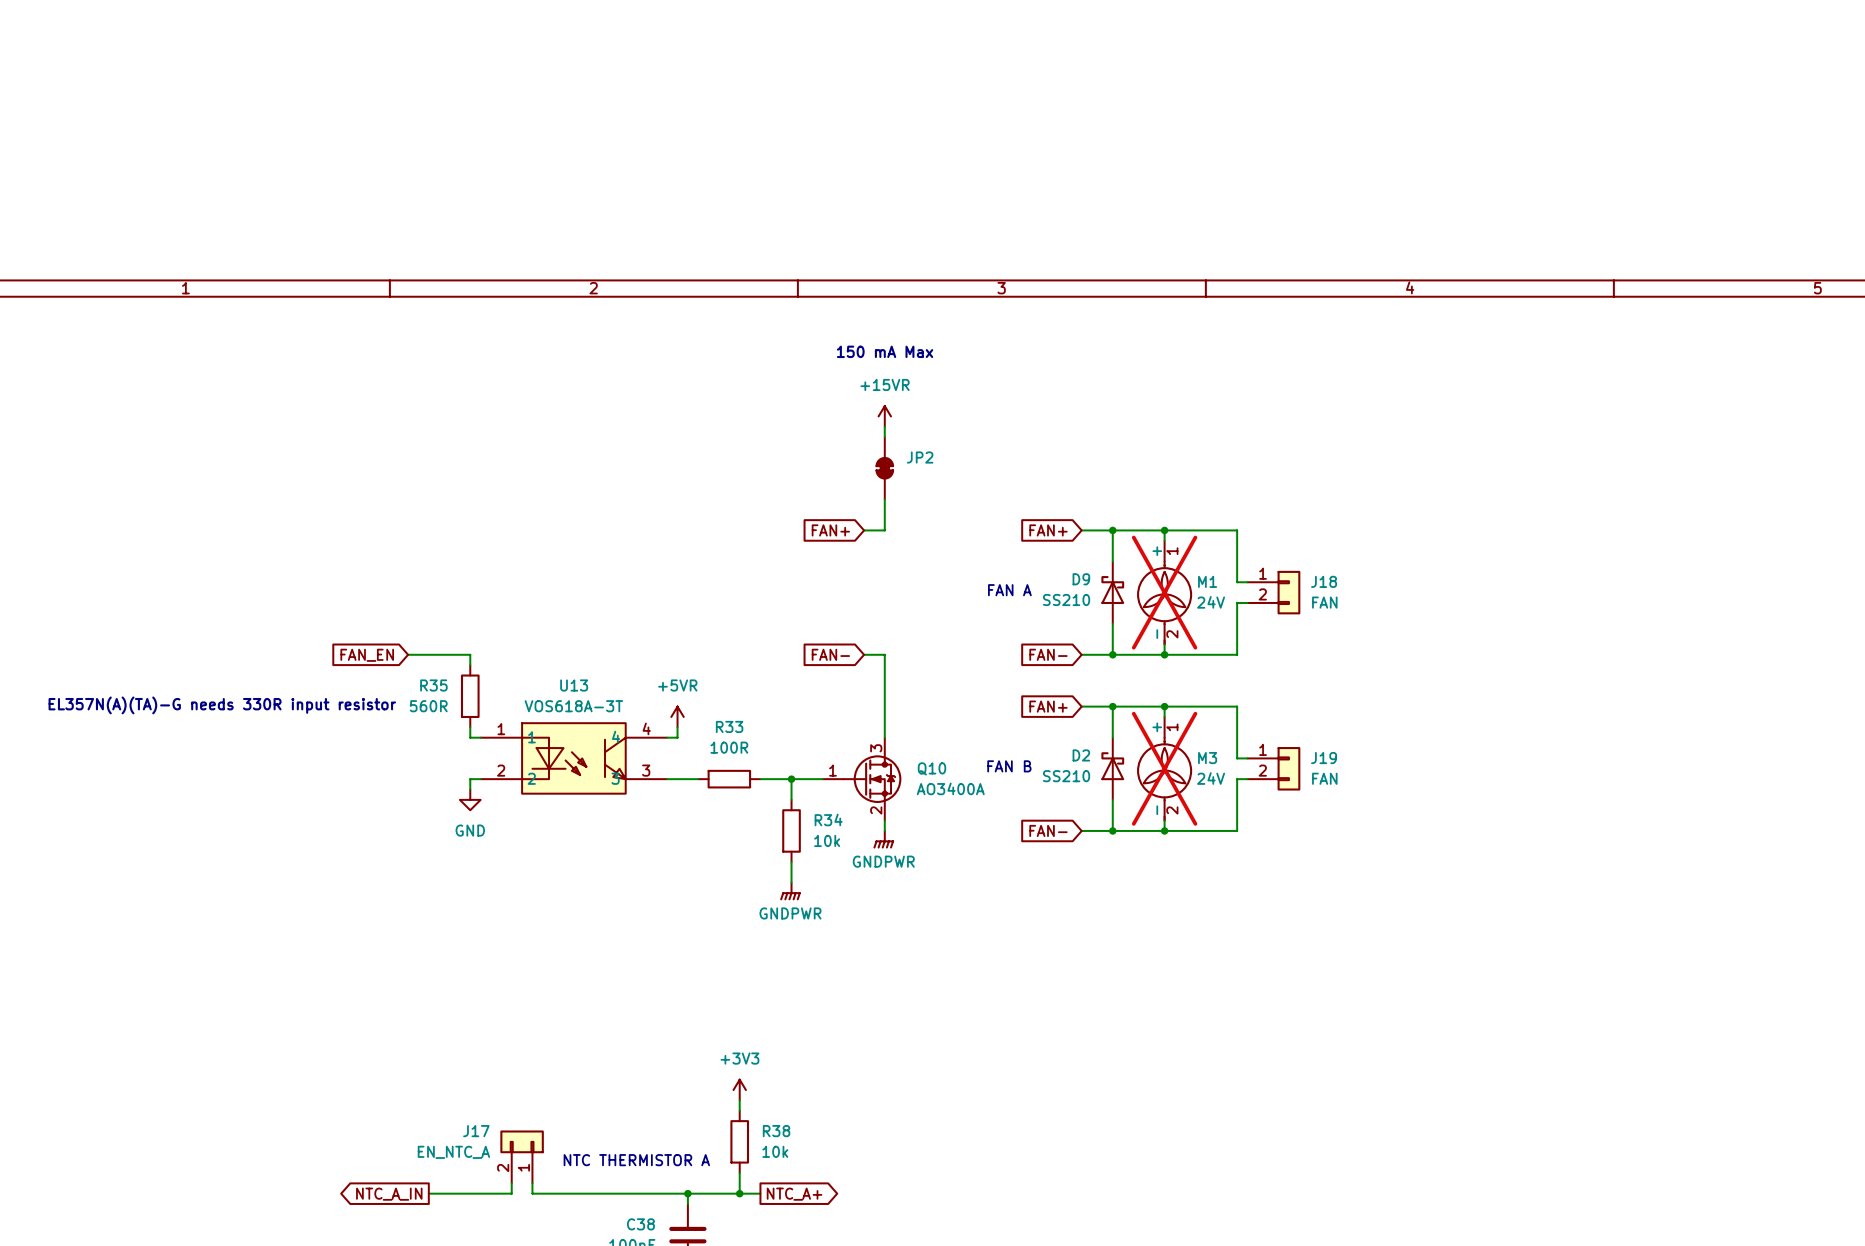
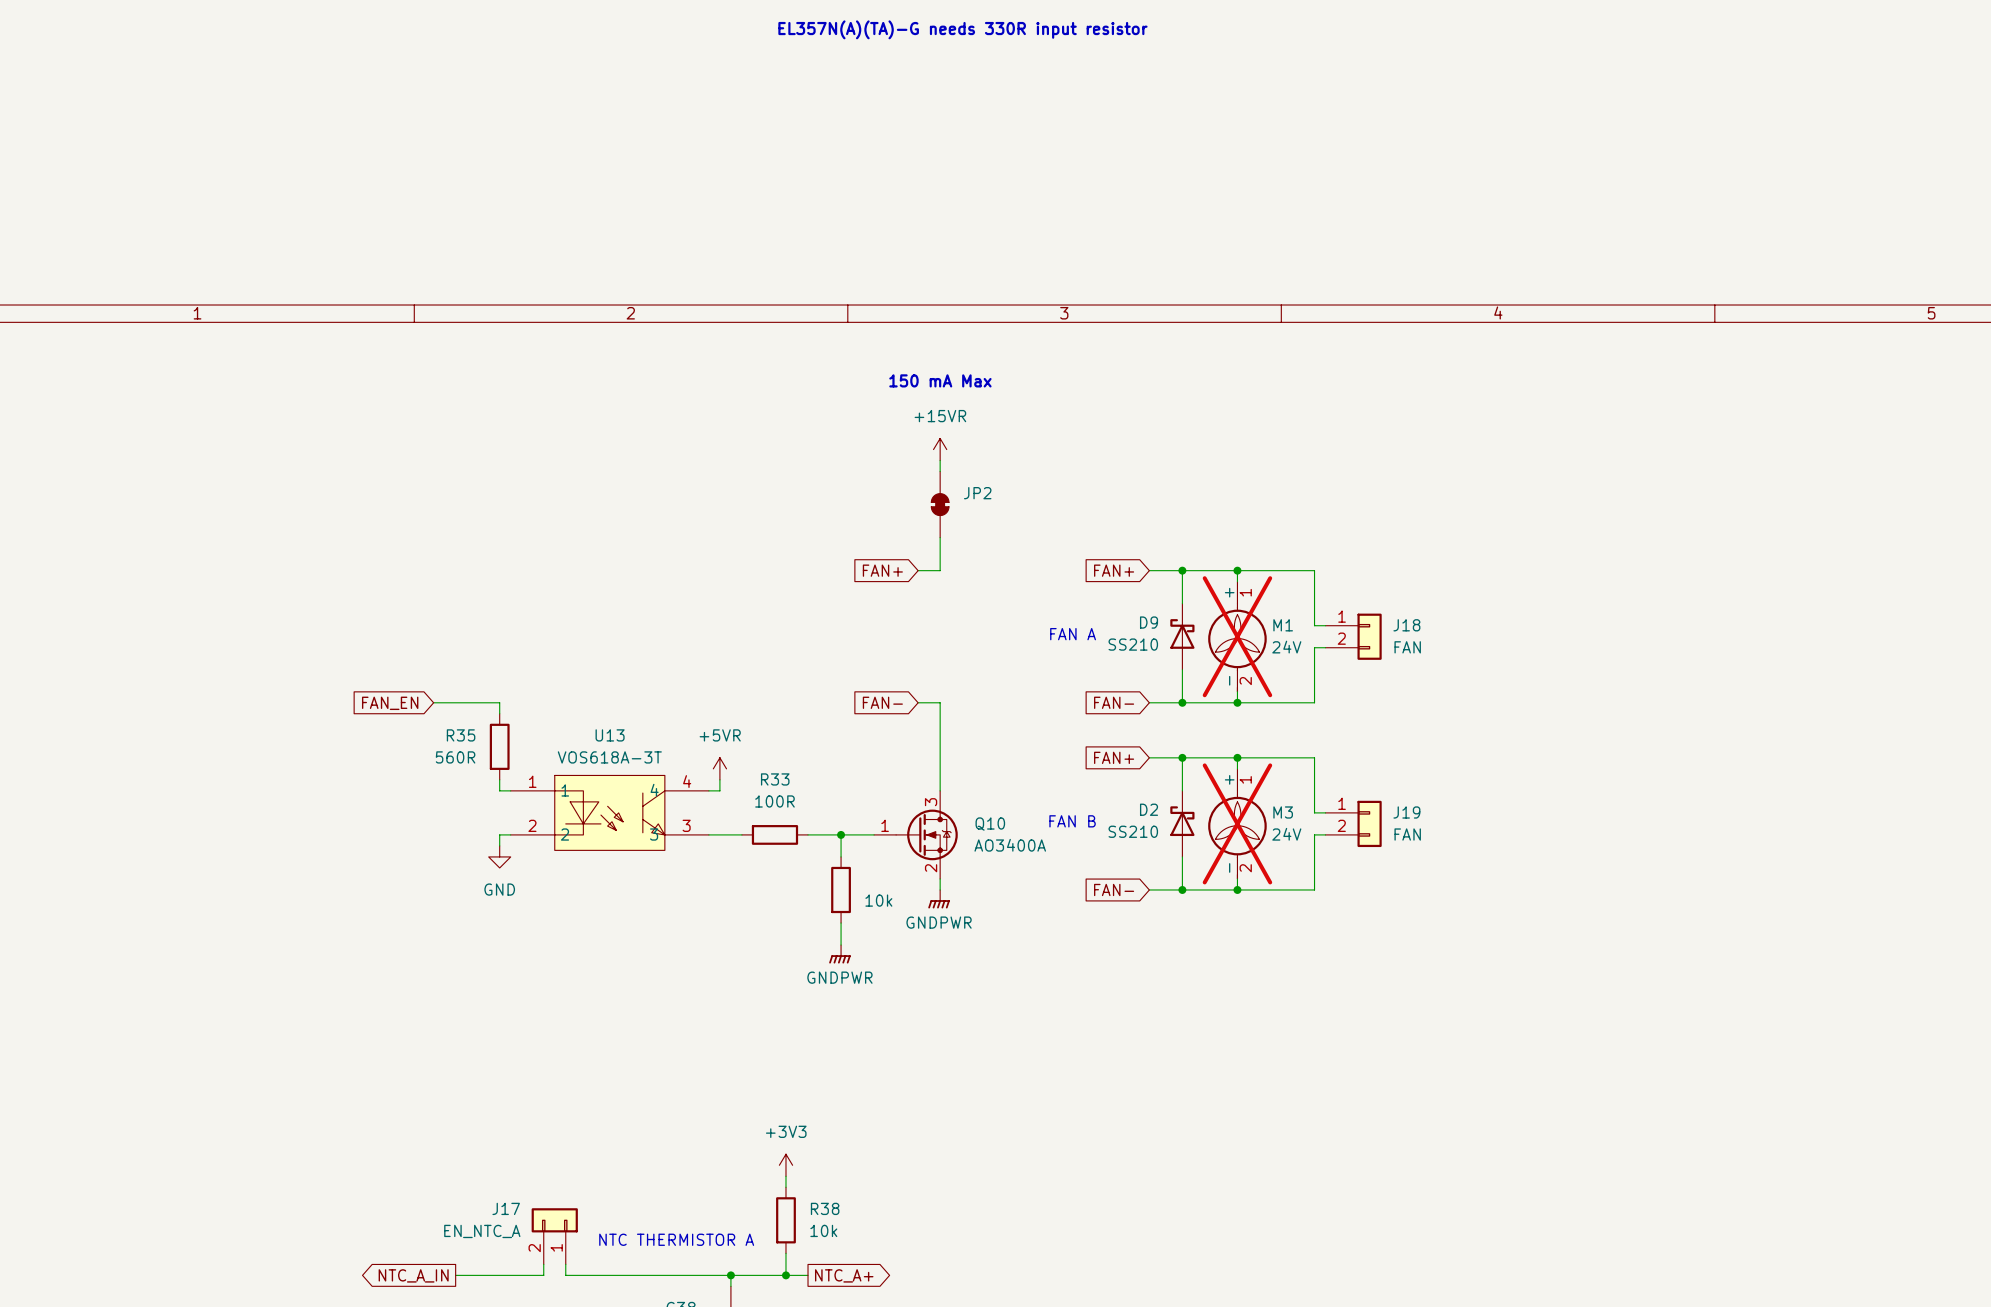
text: none -> EL357N(A)(TA)-G needs 330R input resistor (962, 29)
text: EL357N(A)(TA)-G needs 330R input resistor (222, 705) -> none
R34 name: R34 (828, 819) -> none

